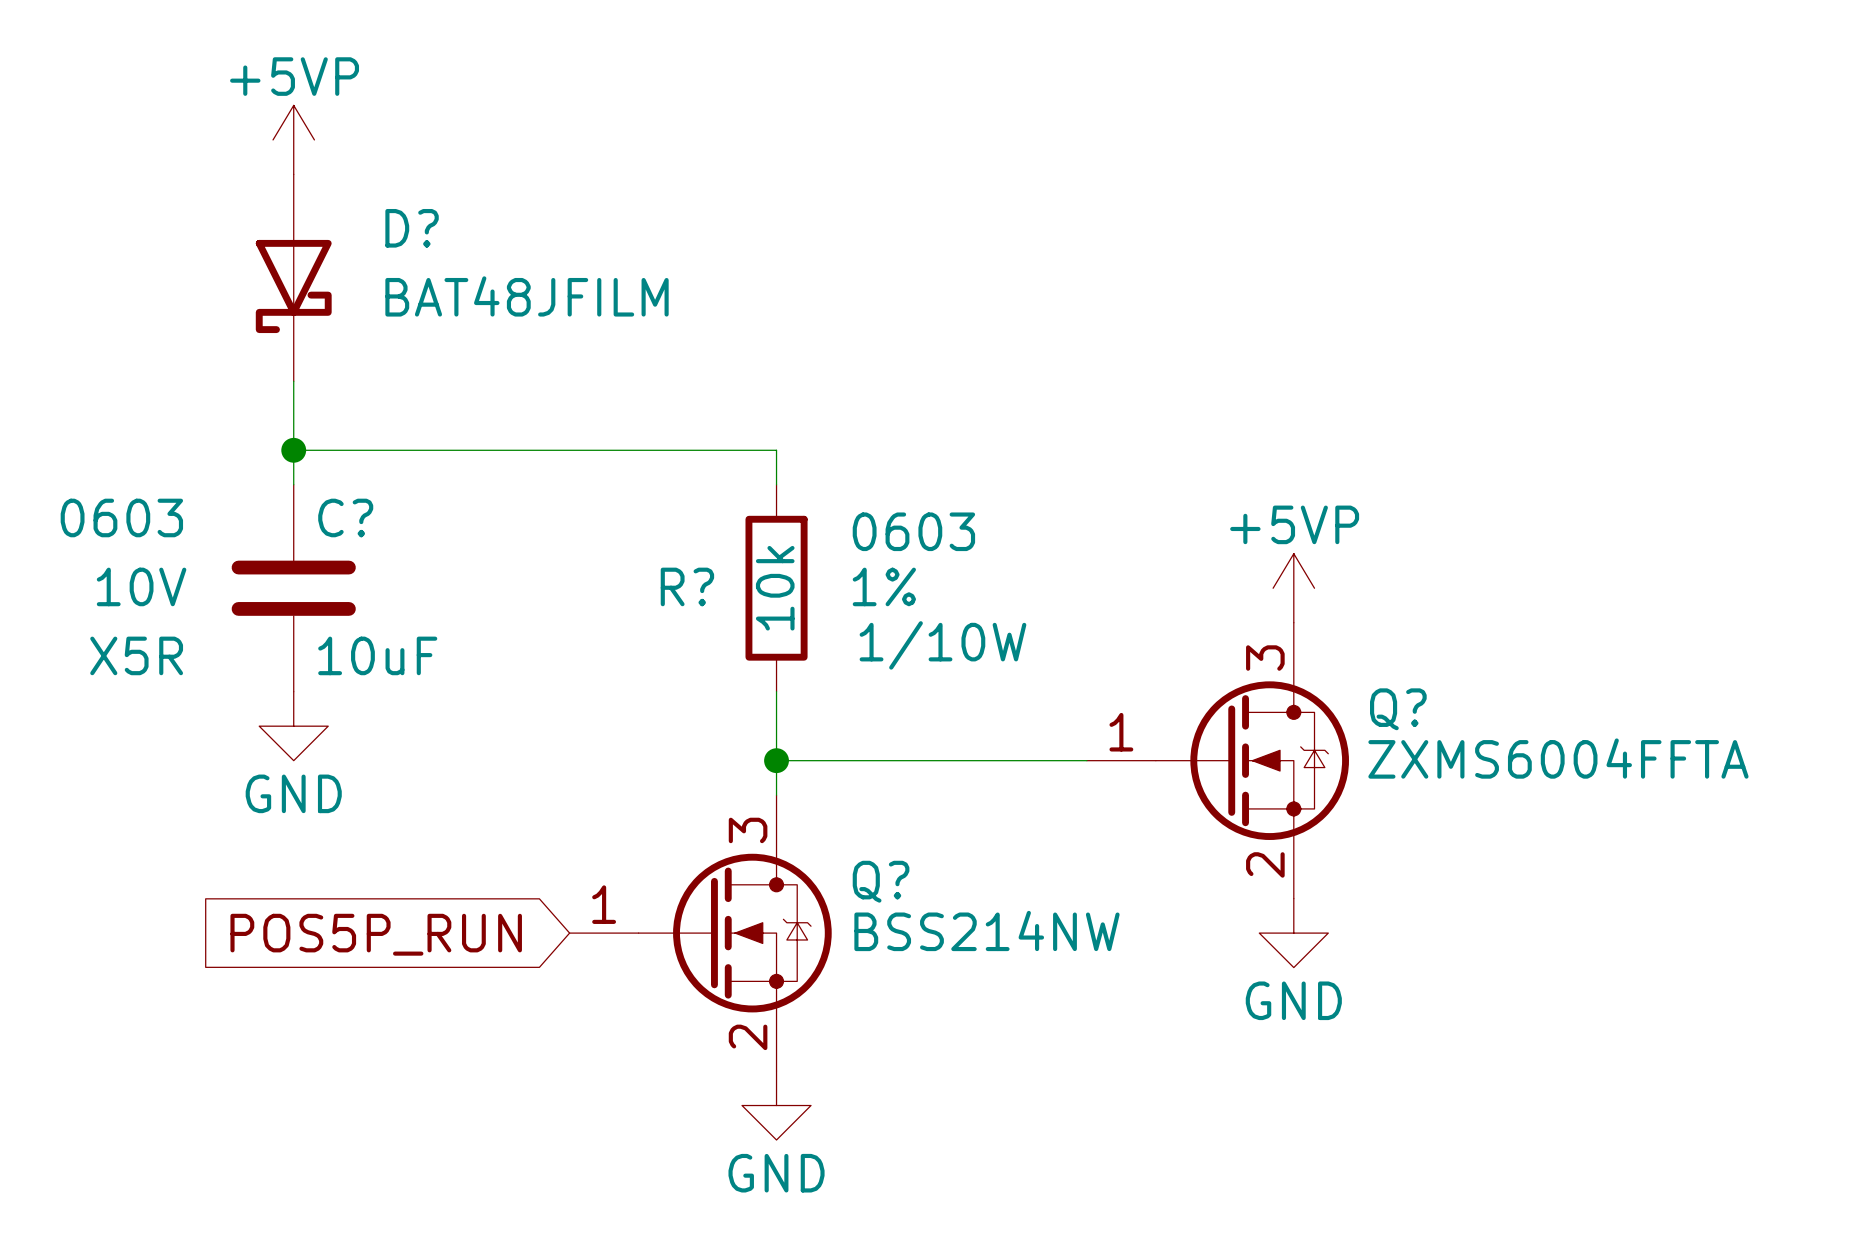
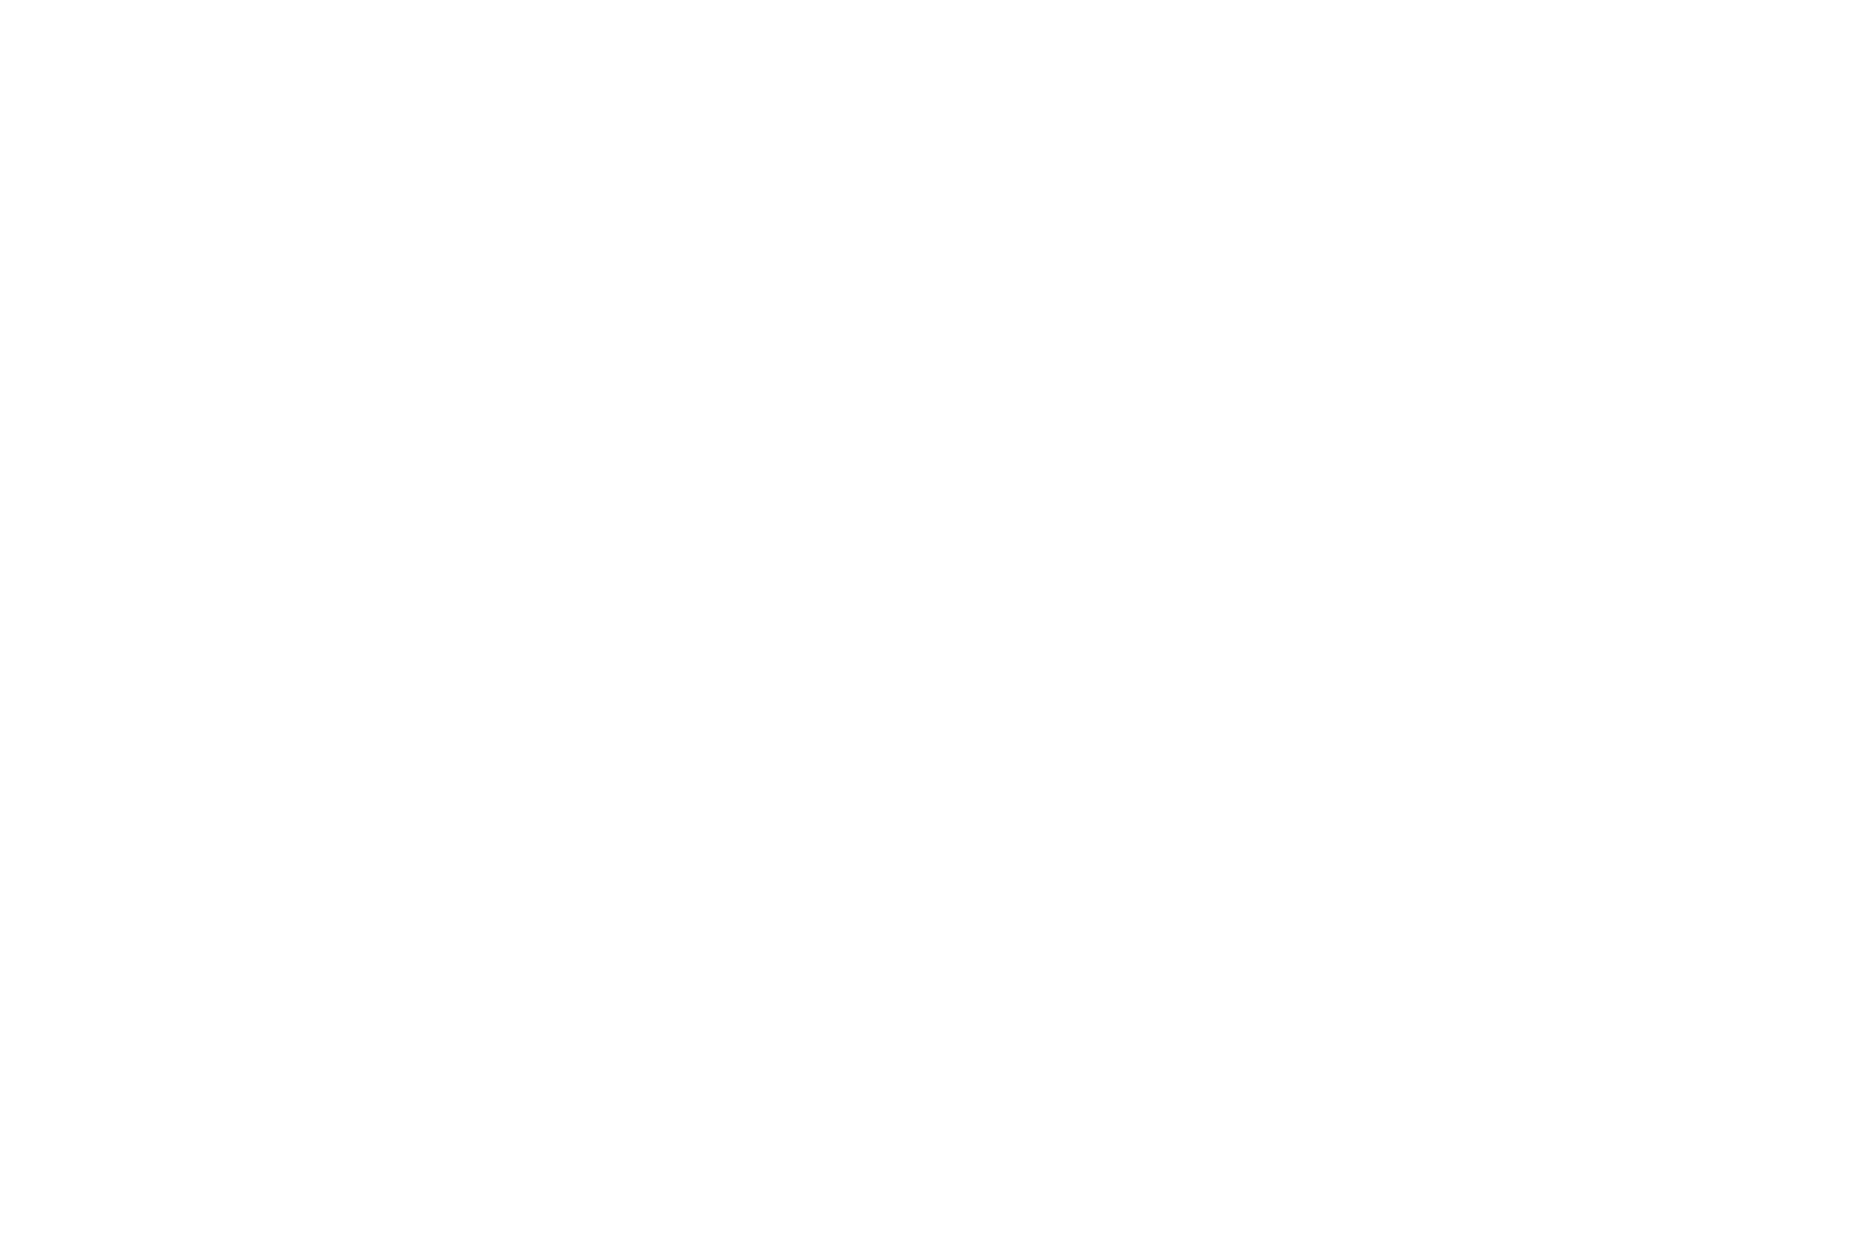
power symbol: +5VP (293, 139) -> none
D?: BAT48JFILM (293, 277) -> none
wire: (293, 381) (293, 484) -> none
wire: (293, 450) (776, 450) (776, 484) -> none
junction: (293, 450) -> none
C?: 10uF (293, 588) -> none
R?: 10k (776, 588) -> none
power symbol: +5VP (1293, 588) -> none
wire: (776, 691) (776, 795) -> none
power symbol: GND (293, 726) -> none
wire: (776, 760) (1086, 760) -> none
junction: (776, 760) -> none
Q?: ZXMS6004FFTA (1217, 760) -> none
Q?: BSS214NW (700, 933) -> none
power symbol: GND (1293, 933) -> none
global label: POS5P_RUN (376, 934) -> none
power symbol: GND (776, 1105) -> none

